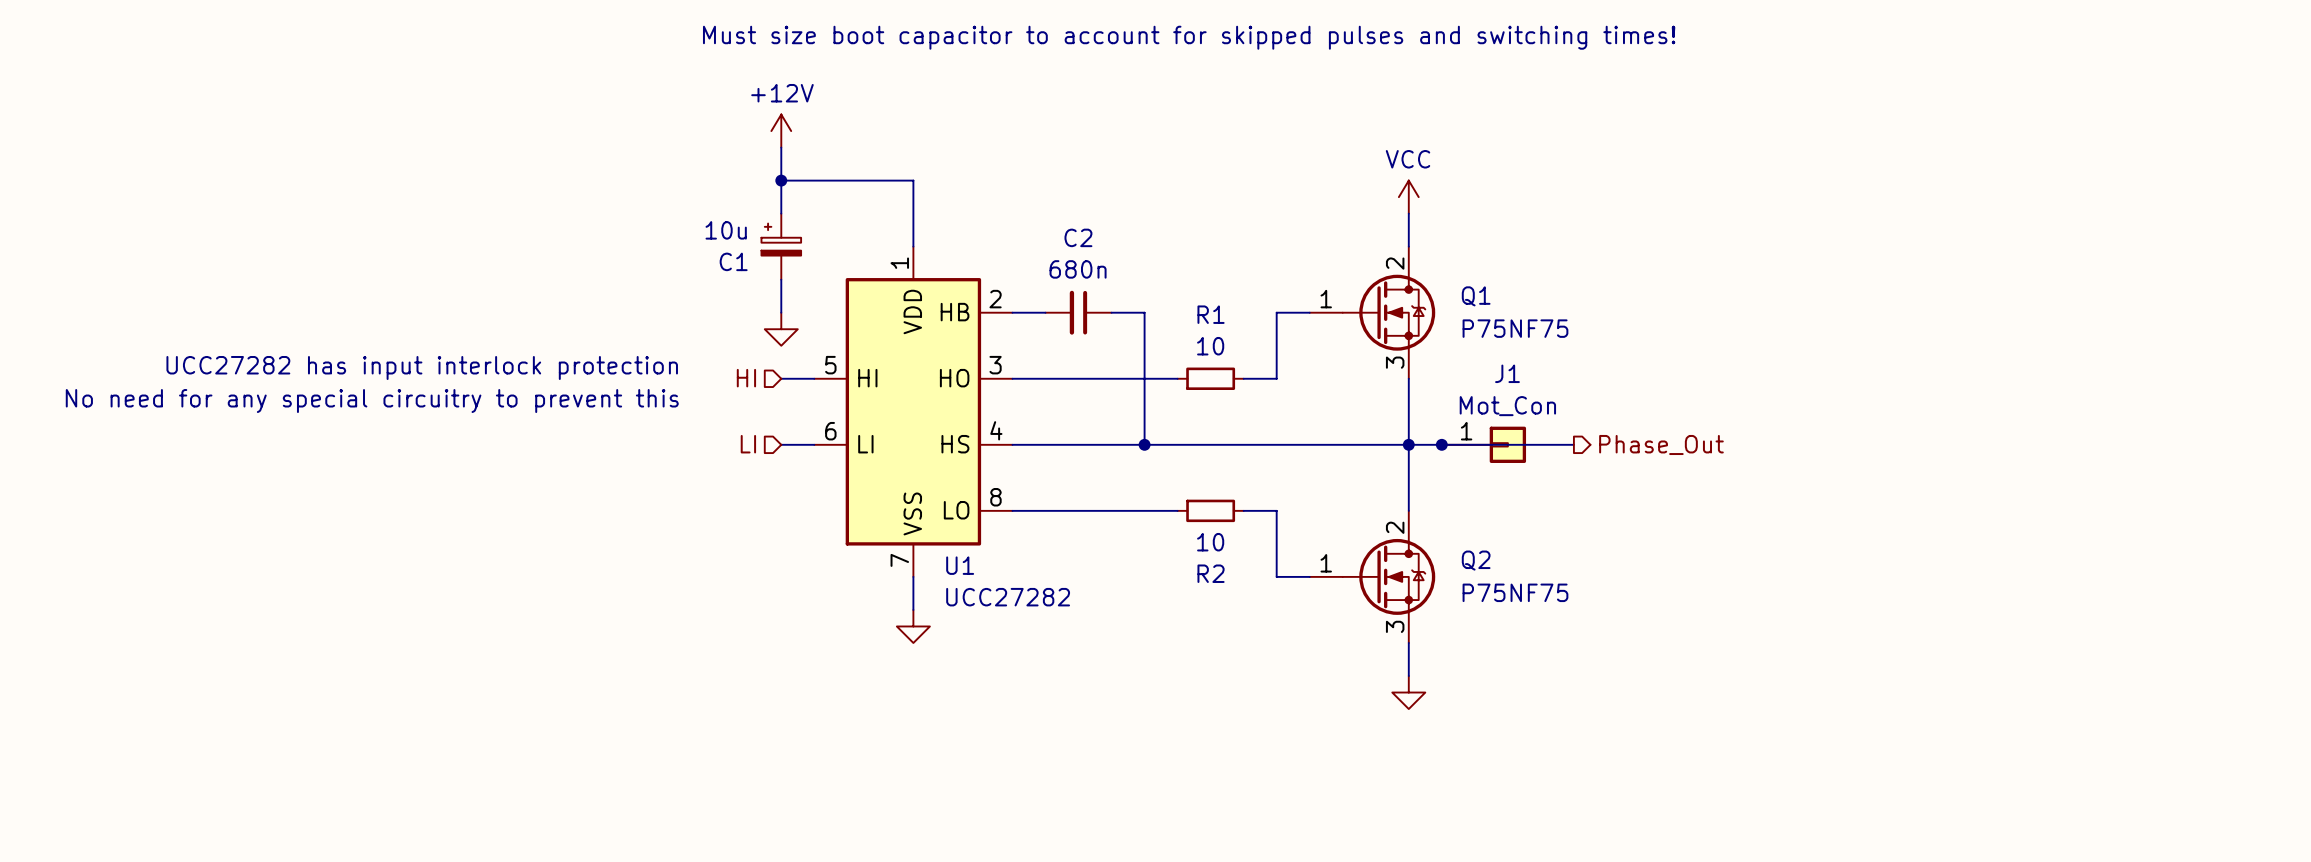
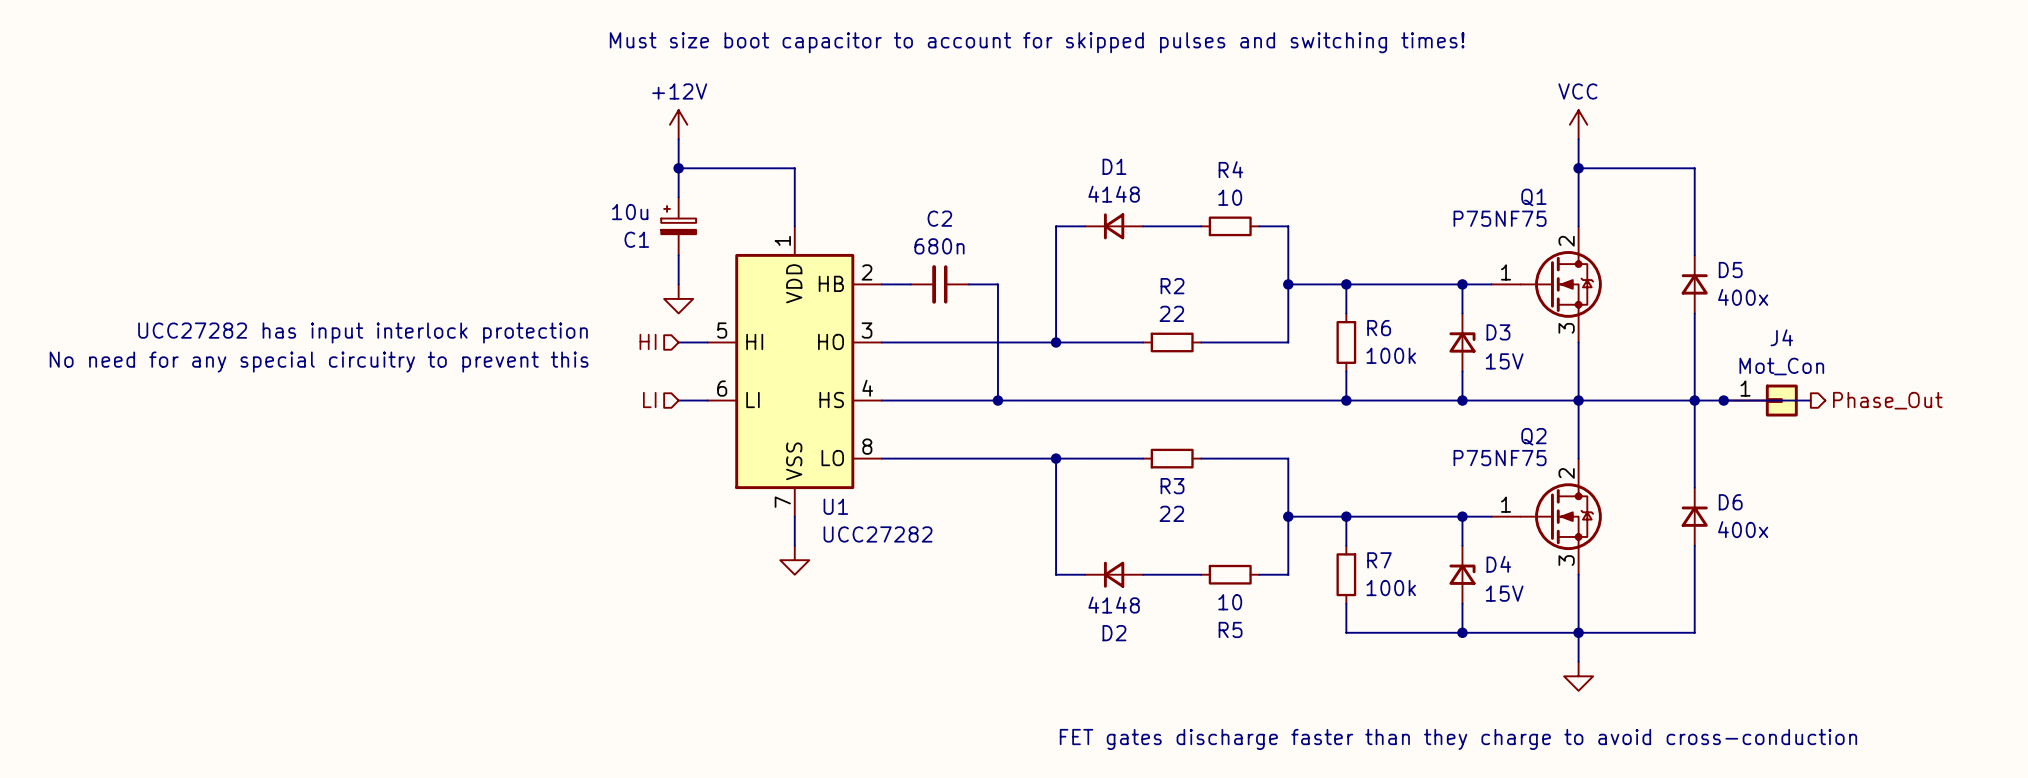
power symbol: none -> VCC (1578, 124)
wire: none -> (1578, 139) (1578, 226)
wire: none -> (1578, 168) (1694, 168) (1694, 255)
junction: none -> (1578, 168)
power symbol: VCC (1408, 197) -> none
wire: (1408, 213) (1408, 246) -> (1346, 284) (1346, 313)
wire: none -> (1085, 226) (1056, 226) (1056, 342)
D1: none -> 4148 (1114, 226)
wire: none -> (1143, 226) (1201, 226)
R4: none -> 10 (1230, 226)
wire: none -> (1259, 226) (1288, 226) (1288, 342) (1201, 342)
Q1 name position: Q1 (1476, 296) -> Q1 (1533, 197)
wire: (1309, 312) (1276, 312) (1276, 378) -> (1143, 342) (1114, 342)
Q1 position: (1372, 312) -> (1546, 284)
wire: none -> (1288, 284) (1491, 284)
junction: none -> (1288, 284)
junction: none -> (1346, 284)
wire: none -> (1462, 284) (1462, 313)
junction: none -> (1462, 284)
D5: none -> 400x (1694, 284)
Q1 value position: P75NF75 (1515, 328) -> P75NF75 (1500, 218)
wire: none -> (1694, 313) (1694, 487)
wire: none -> (1027, 342) (1085, 342)
junction: none -> (1056, 342)
R1: 10 (1210, 378) -> none
wire: (1408, 378) (1408, 510) -> none
R6: none -> 100k (1346, 342)
D3: none -> 15V (1462, 342)
wire: none -> (1578, 342) (1578, 458)
wire: none -> (1346, 371) (1346, 400)
wire: none -> (1462, 371) (1462, 400)
junction: (1408, 444) -> none
junction: (1441, 444) -> none
J1: Mot_Con (1483, 444) -> none
junction: none -> (1346, 400)
wire: none -> (1375, 400) (1810, 400)
hierarchical label: Phase_Out (1661, 444) -> none
junction: none -> (1462, 400)
junction: none -> (1578, 400)
junction: none -> (1694, 400)
junction: none -> (1723, 400)
J4: none -> Mot_Con (1760, 400)
hierarchical label: none -> Phase_Out (1887, 400)
wire: none -> (1027, 458) (1085, 458)
wire: none -> (1056, 458) (1056, 574) (1085, 574)
junction: none -> (1056, 458)
R2 position: (1210, 510) -> (1172, 342)
wire: (1276, 510) (1276, 576) (1309, 576) -> (1114, 458) (1143, 458)
R3: none -> 22 (1172, 458)
wire: none -> (1201, 458) (1288, 458) (1288, 574) (1259, 574)
R2 value: 10 (1210, 542) -> 22 (1171, 313)
Q2 name position: Q2 (1476, 560) -> Q2 (1533, 436)
R2 name position: R2 (1211, 573) -> R2 (1172, 286)
Q2 position: (1372, 576) -> (1546, 516)
wire: none -> (1288, 516) (1491, 516)
junction: none -> (1288, 516)
junction: none -> (1346, 516)
wire: none -> (1462, 516) (1462, 545)
junction: none -> (1462, 516)
D6: none -> 400x (1694, 516)
Q2 value position: P75NF75 (1515, 592) -> P75NF75 (1500, 458)
wire: none -> (1694, 545) (1694, 632) (1346, 632) (1346, 603)
D2: none -> 4148 (1114, 574)
wire: none -> (1143, 574) (1201, 574)
wire: (1408, 642) (1408, 676) -> (1346, 516) (1346, 545)
R5: none -> 10 (1230, 574)
R7: none -> 100k (1346, 574)
D4: none -> 15V (1462, 574)
wire: none -> (1578, 574) (1578, 661)
wire: none -> (1462, 603) (1462, 632)
power symbol: (1408, 692) -> none
junction: none -> (1462, 632)
junction: none -> (1578, 632)
power symbol: none -> (1578, 676)
text: none -> FET gates discharge faster than they charge to avoid cross-conduction (1458, 739)

